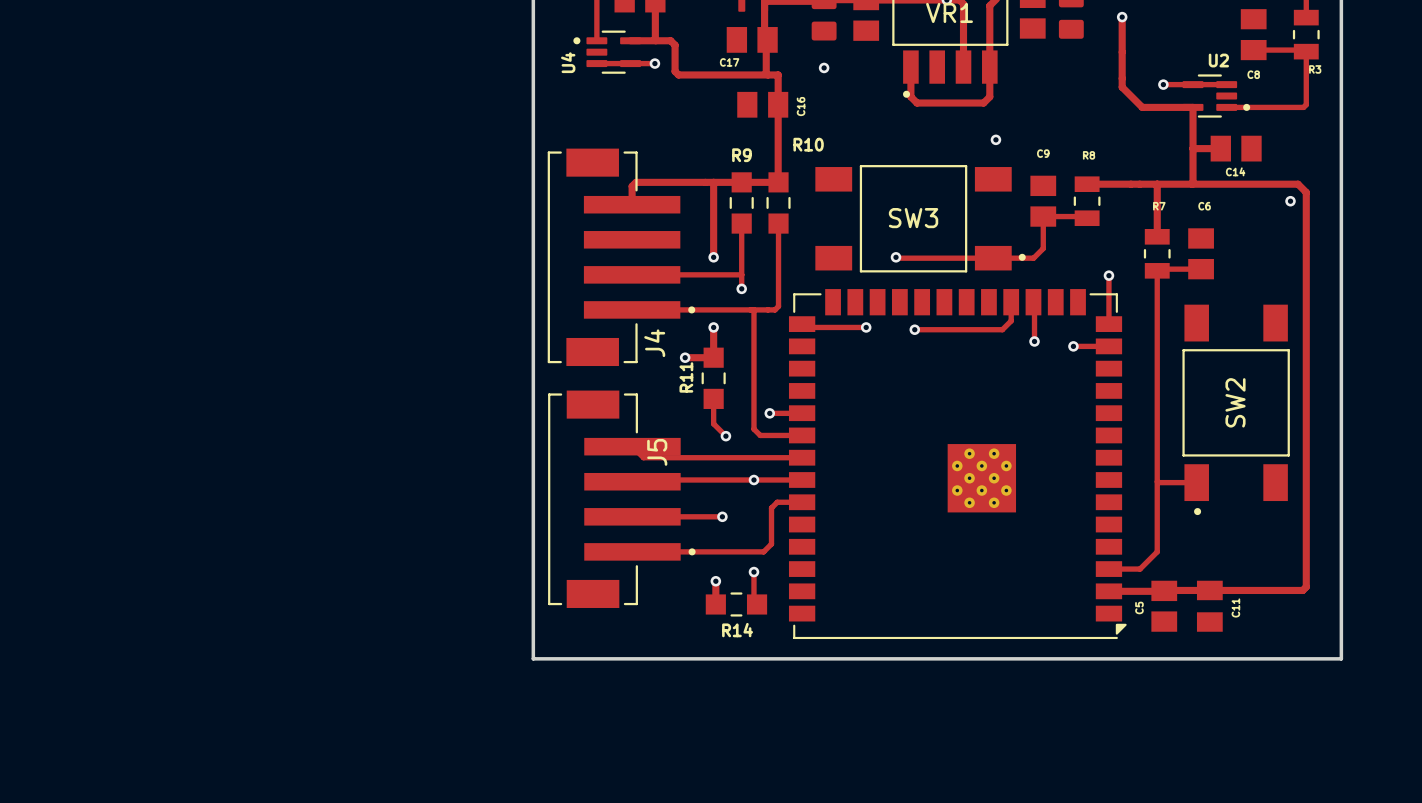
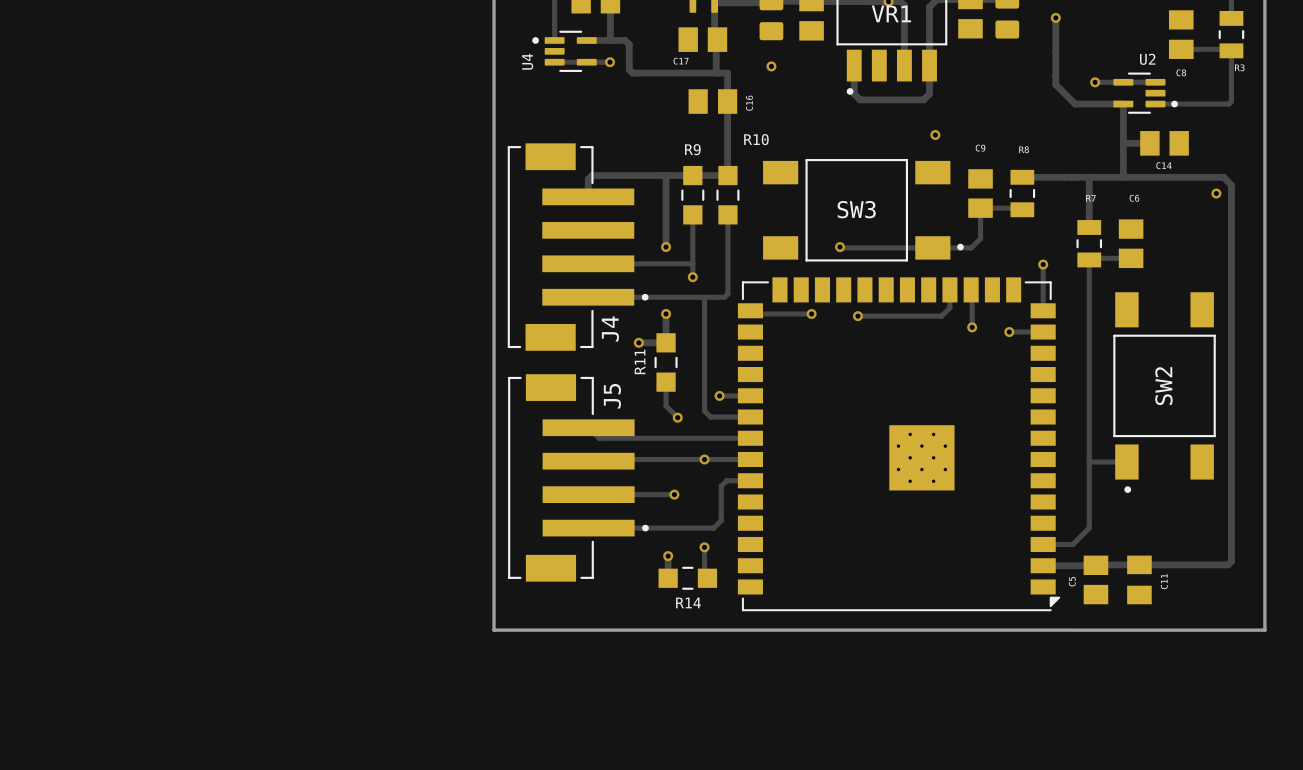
J5 name position: J5 (657, 452) -> J5 (612, 396)

